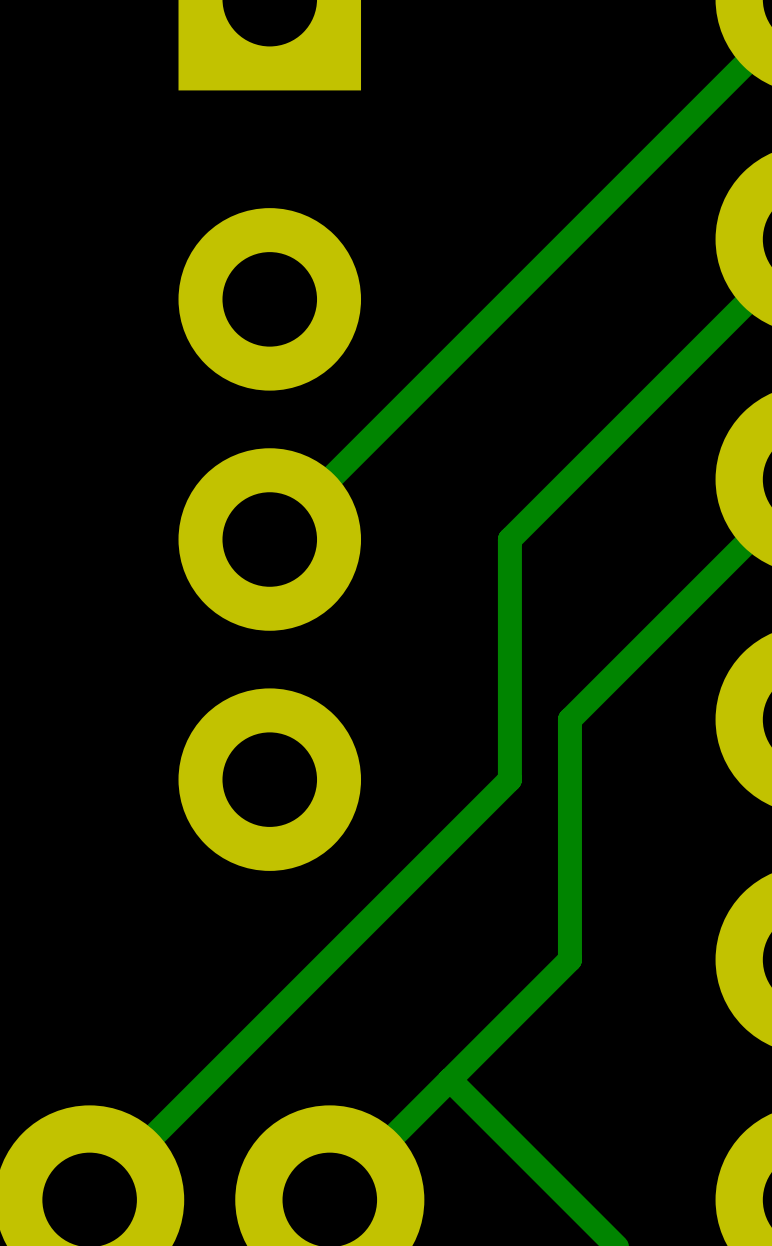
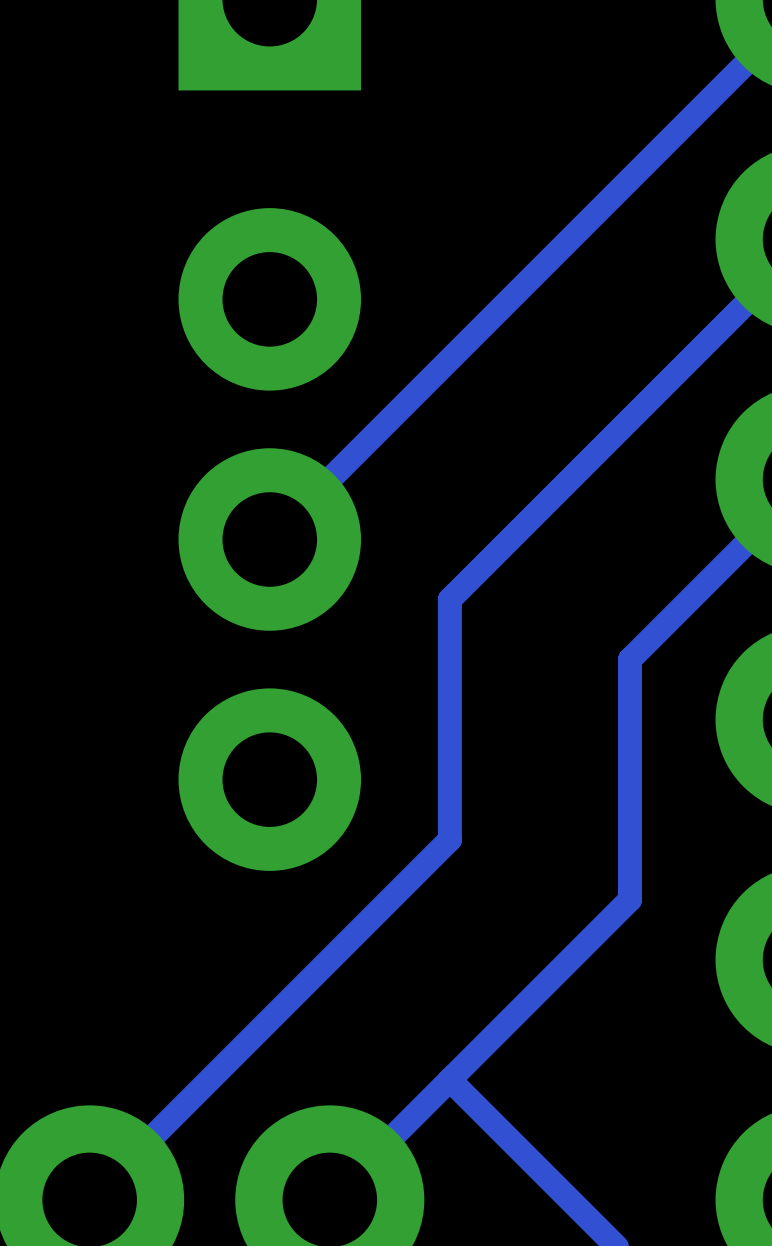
track: (509, 539) (509, 779) (449, 839) -> (509, 539) (449, 599) (449, 839)
track: (629, 659) (569, 719) (569, 959) -> (629, 659) (629, 899) (569, 959)

